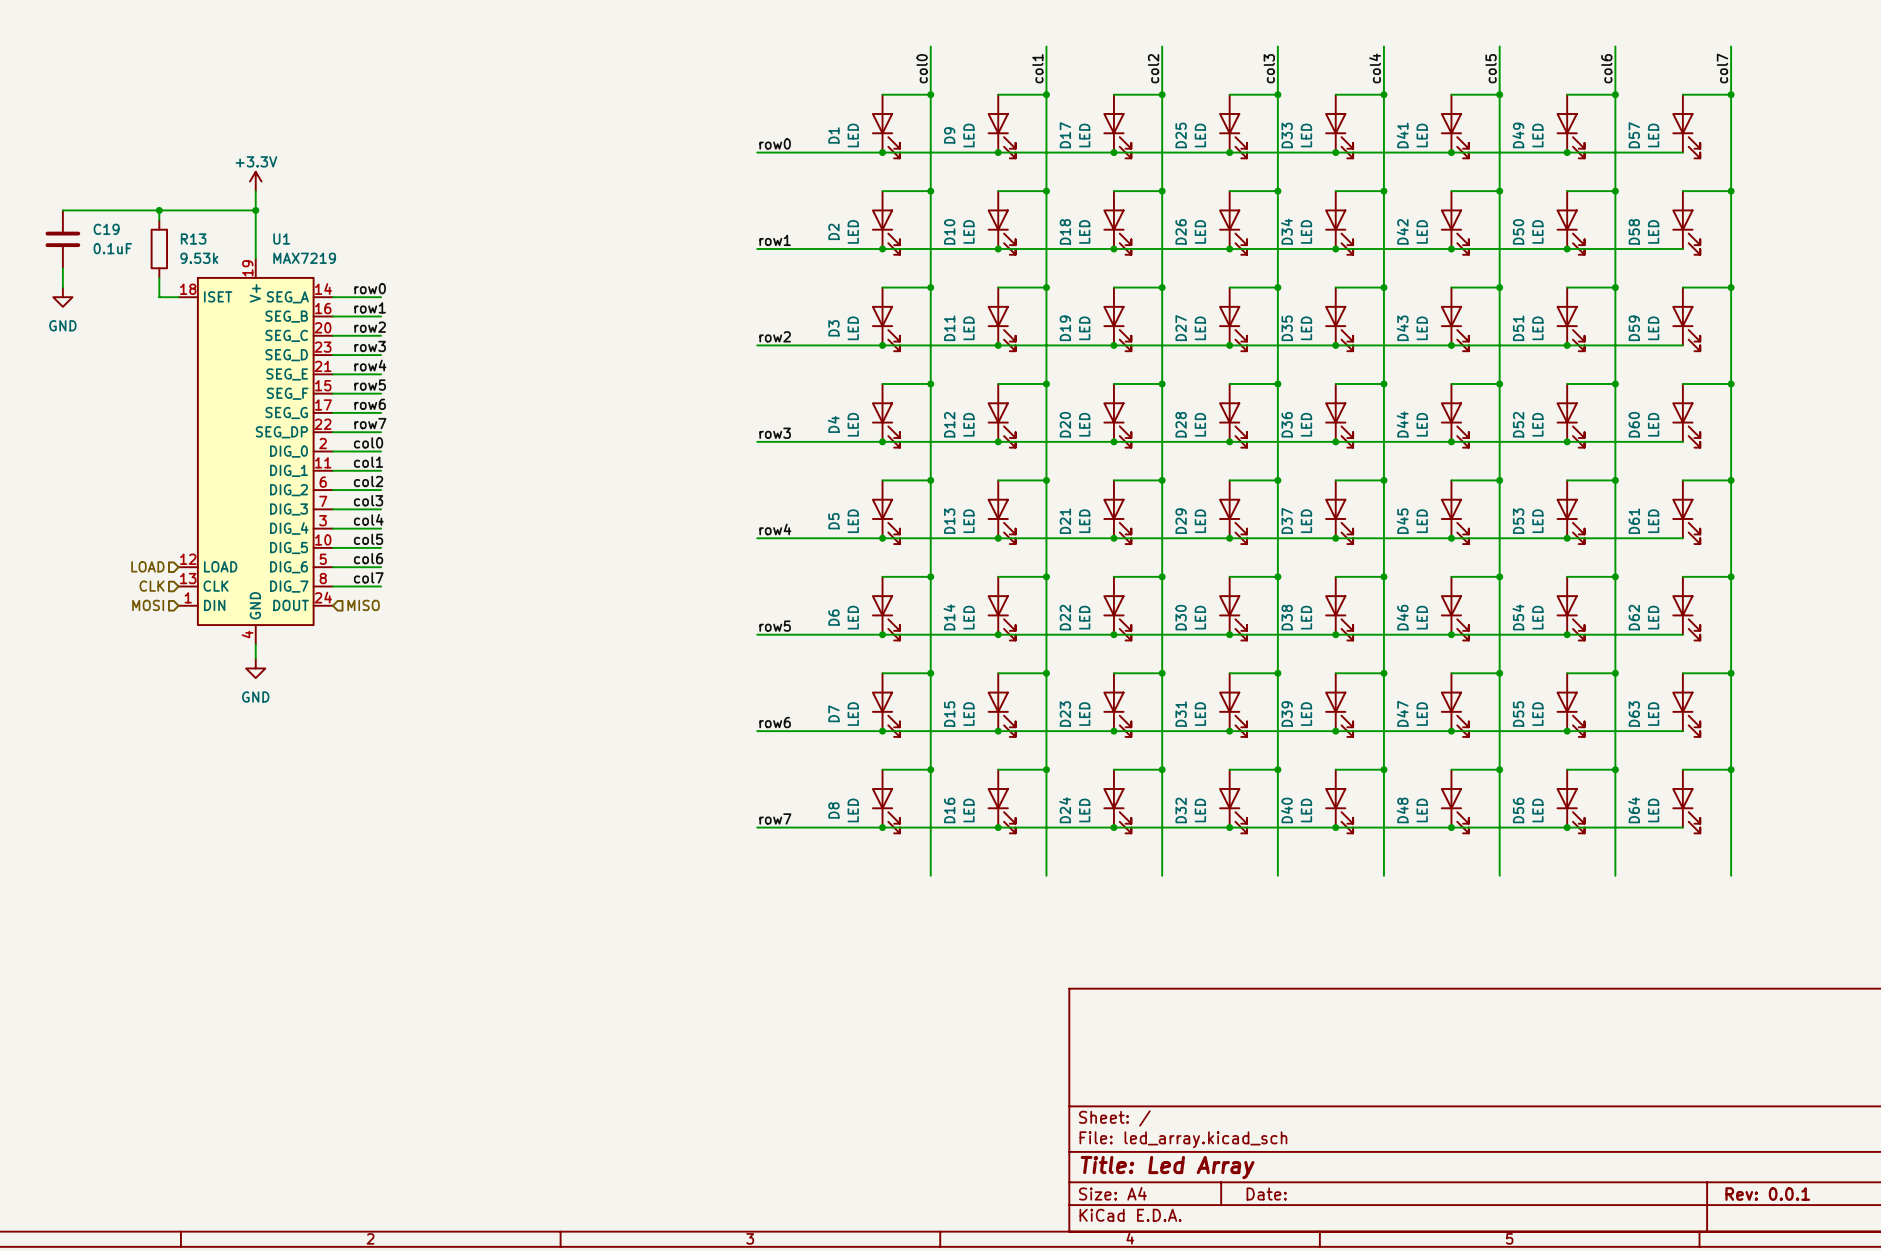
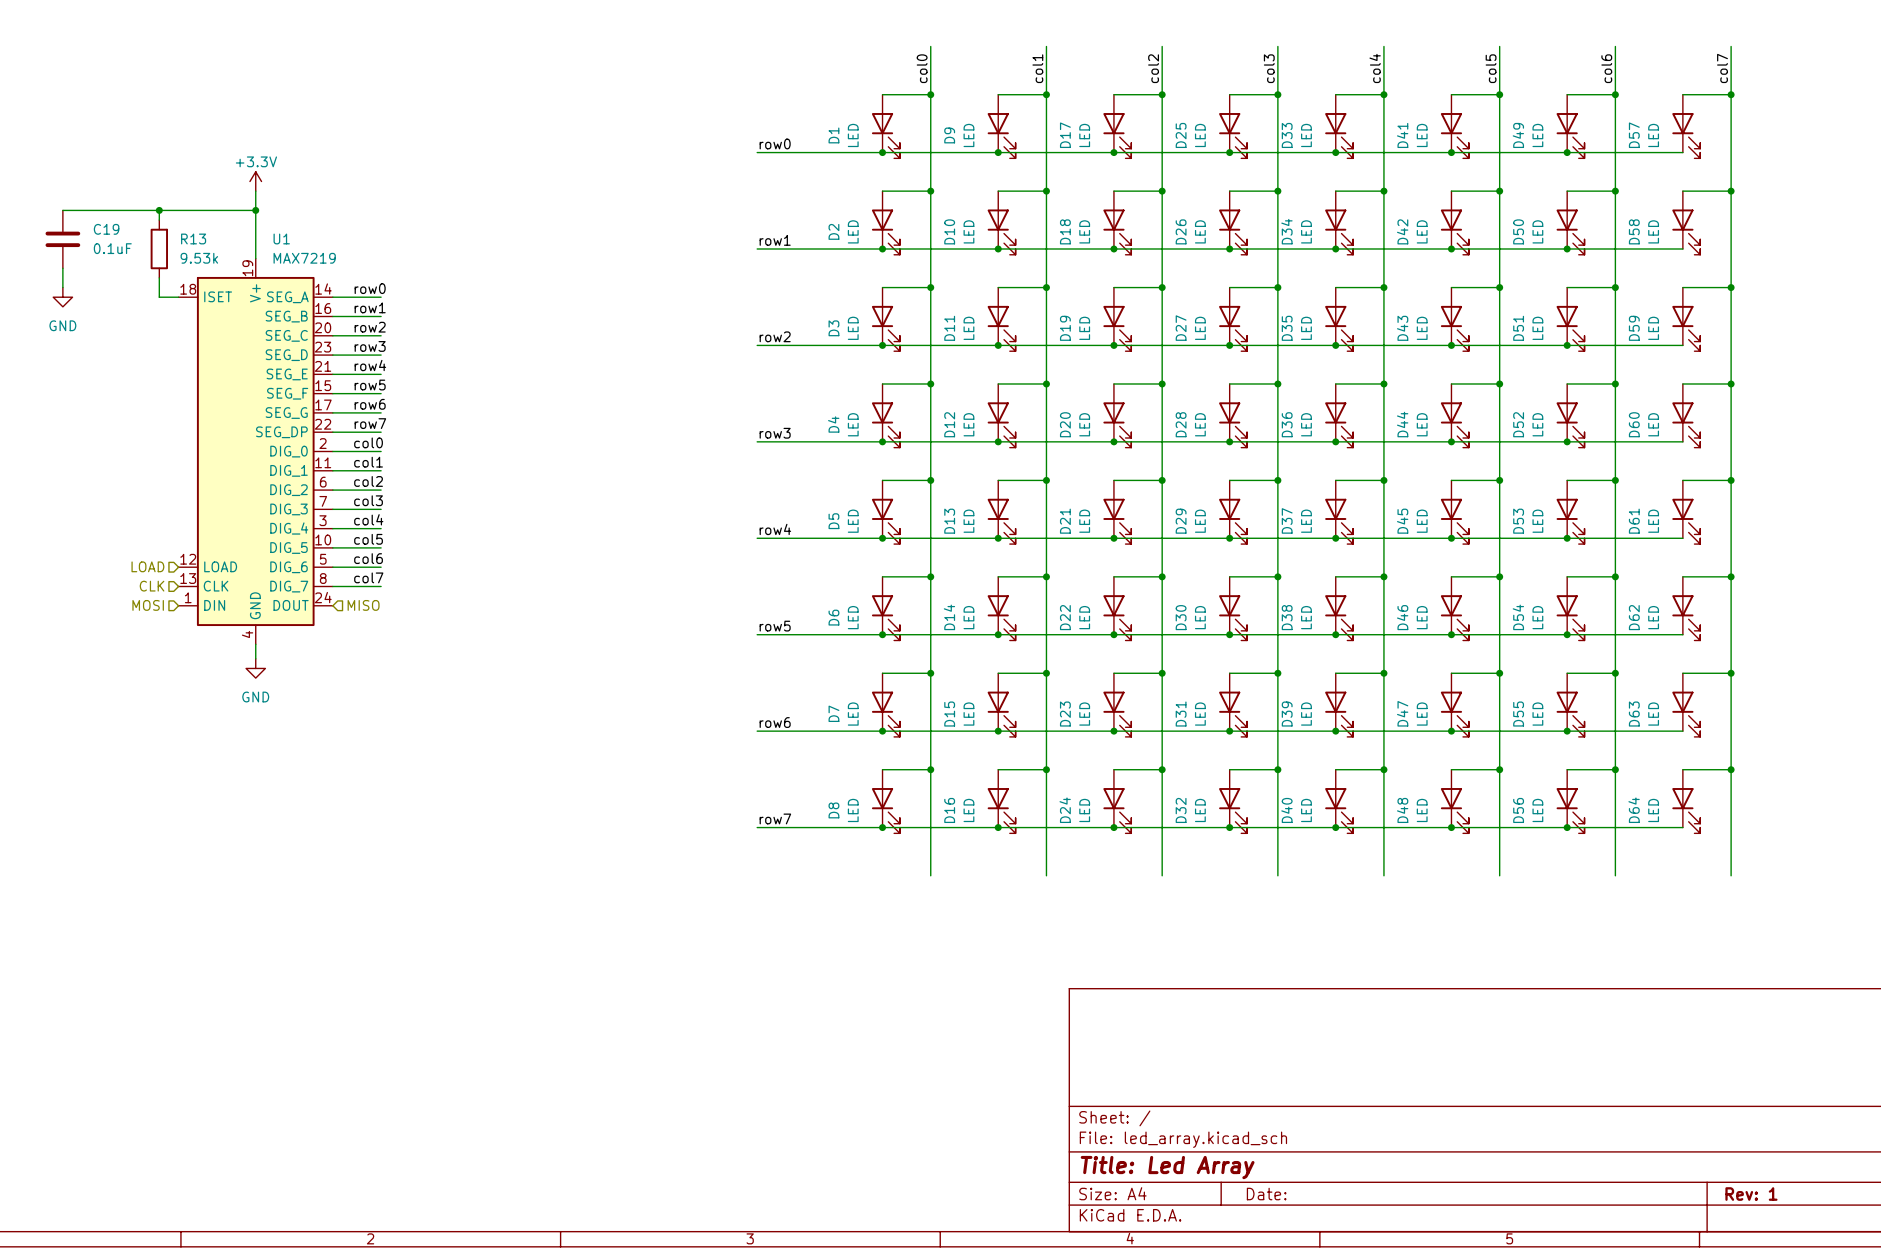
title block: Rev: 0.0.1 (1767, 1194) -> Rev: 1 (1751, 1194)

